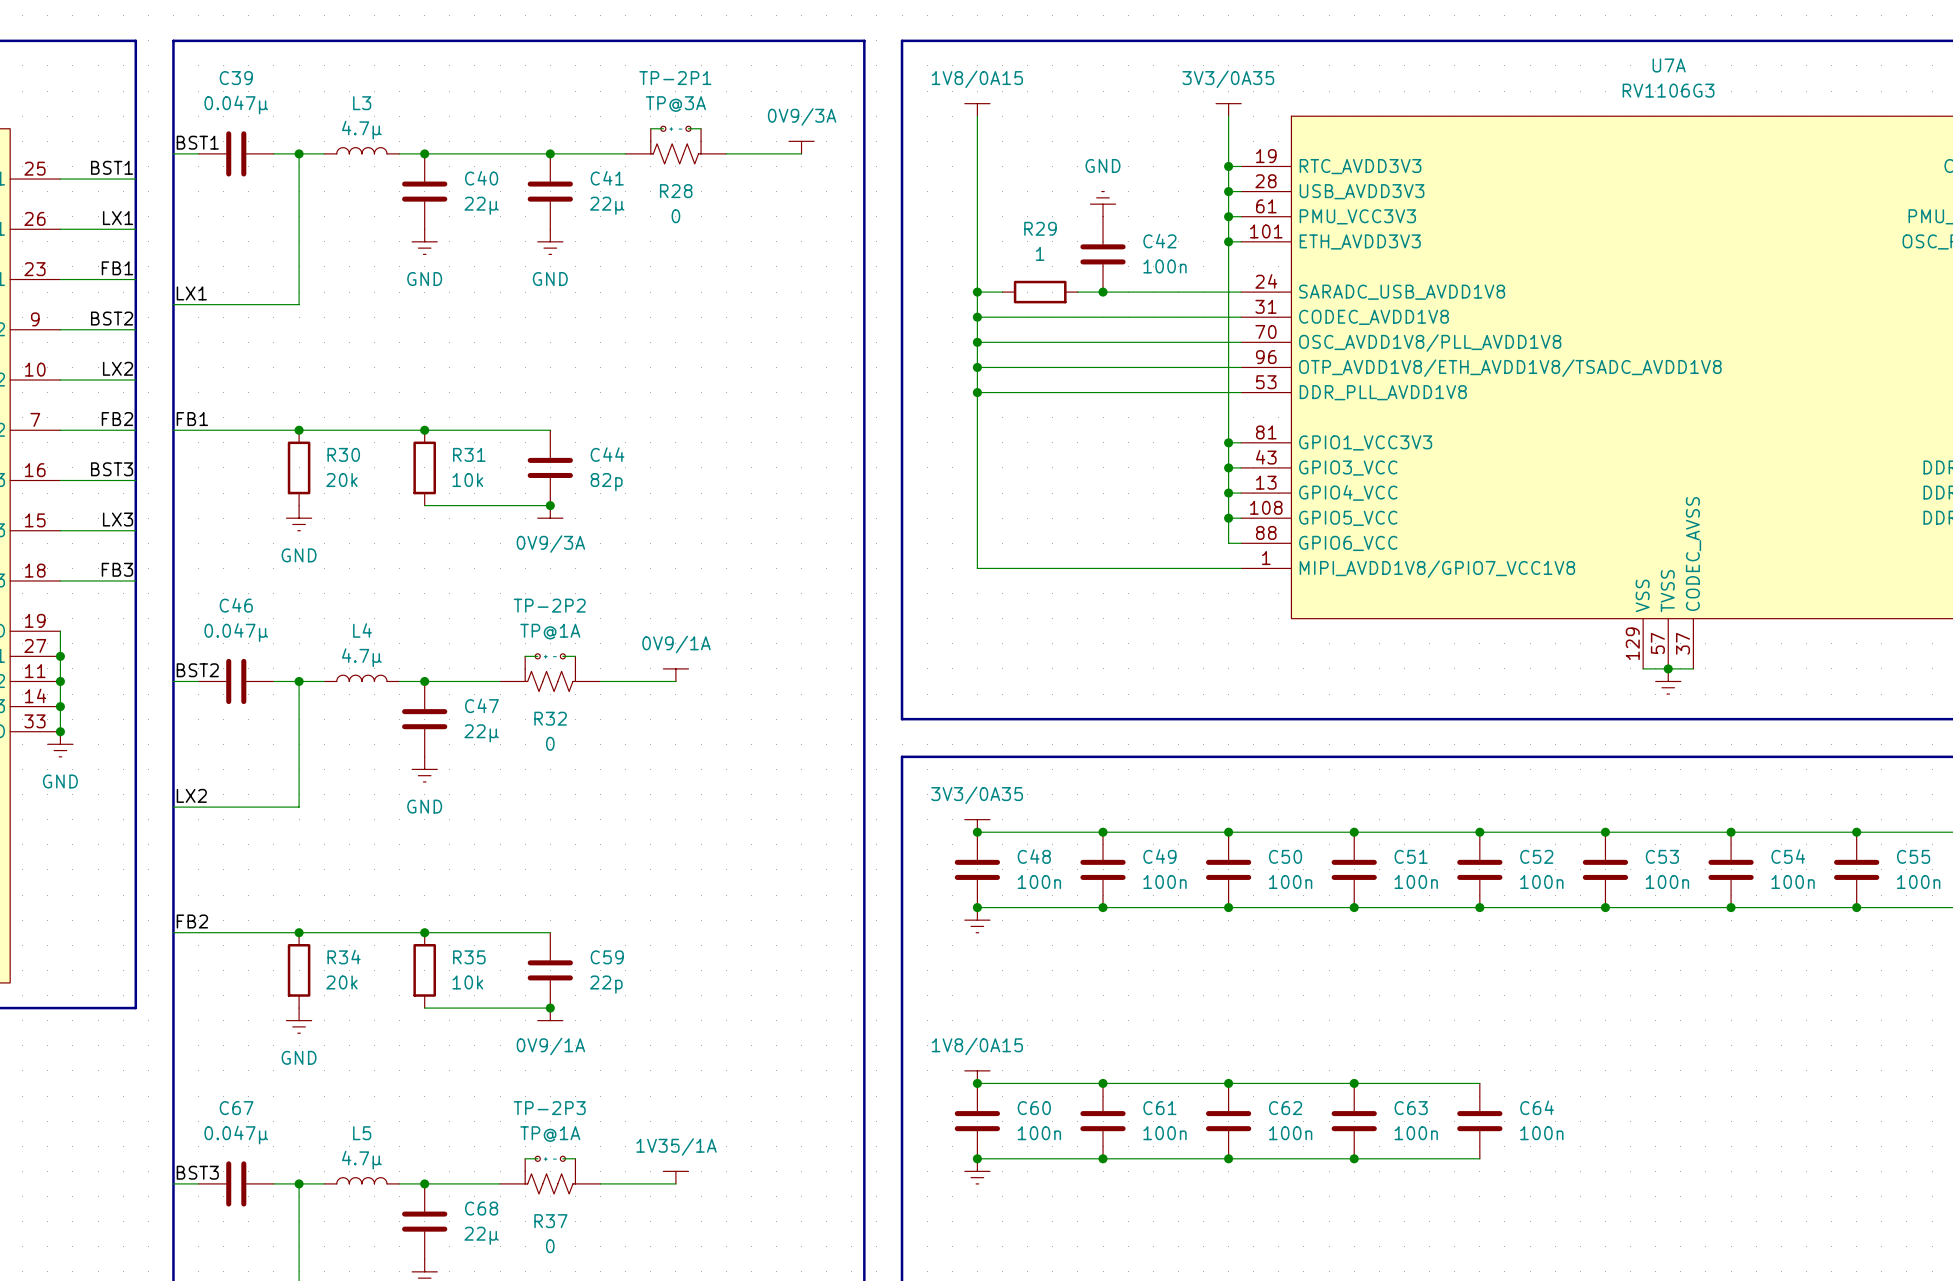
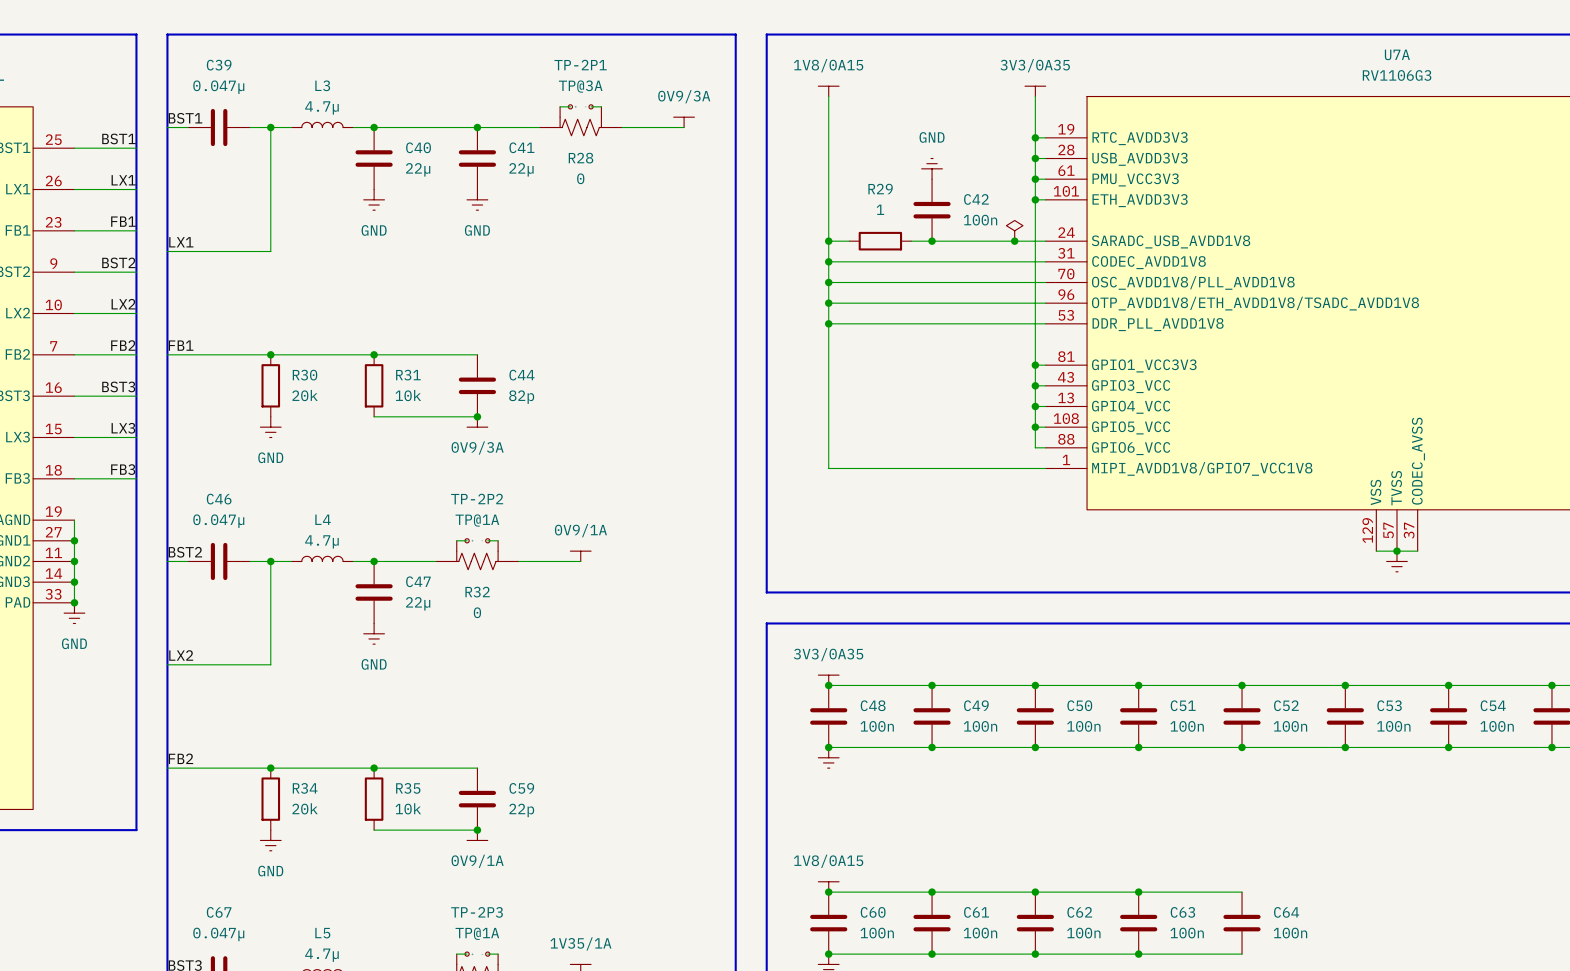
power symbol: none -> (1014, 230)
junction: none -> (1014, 241)

